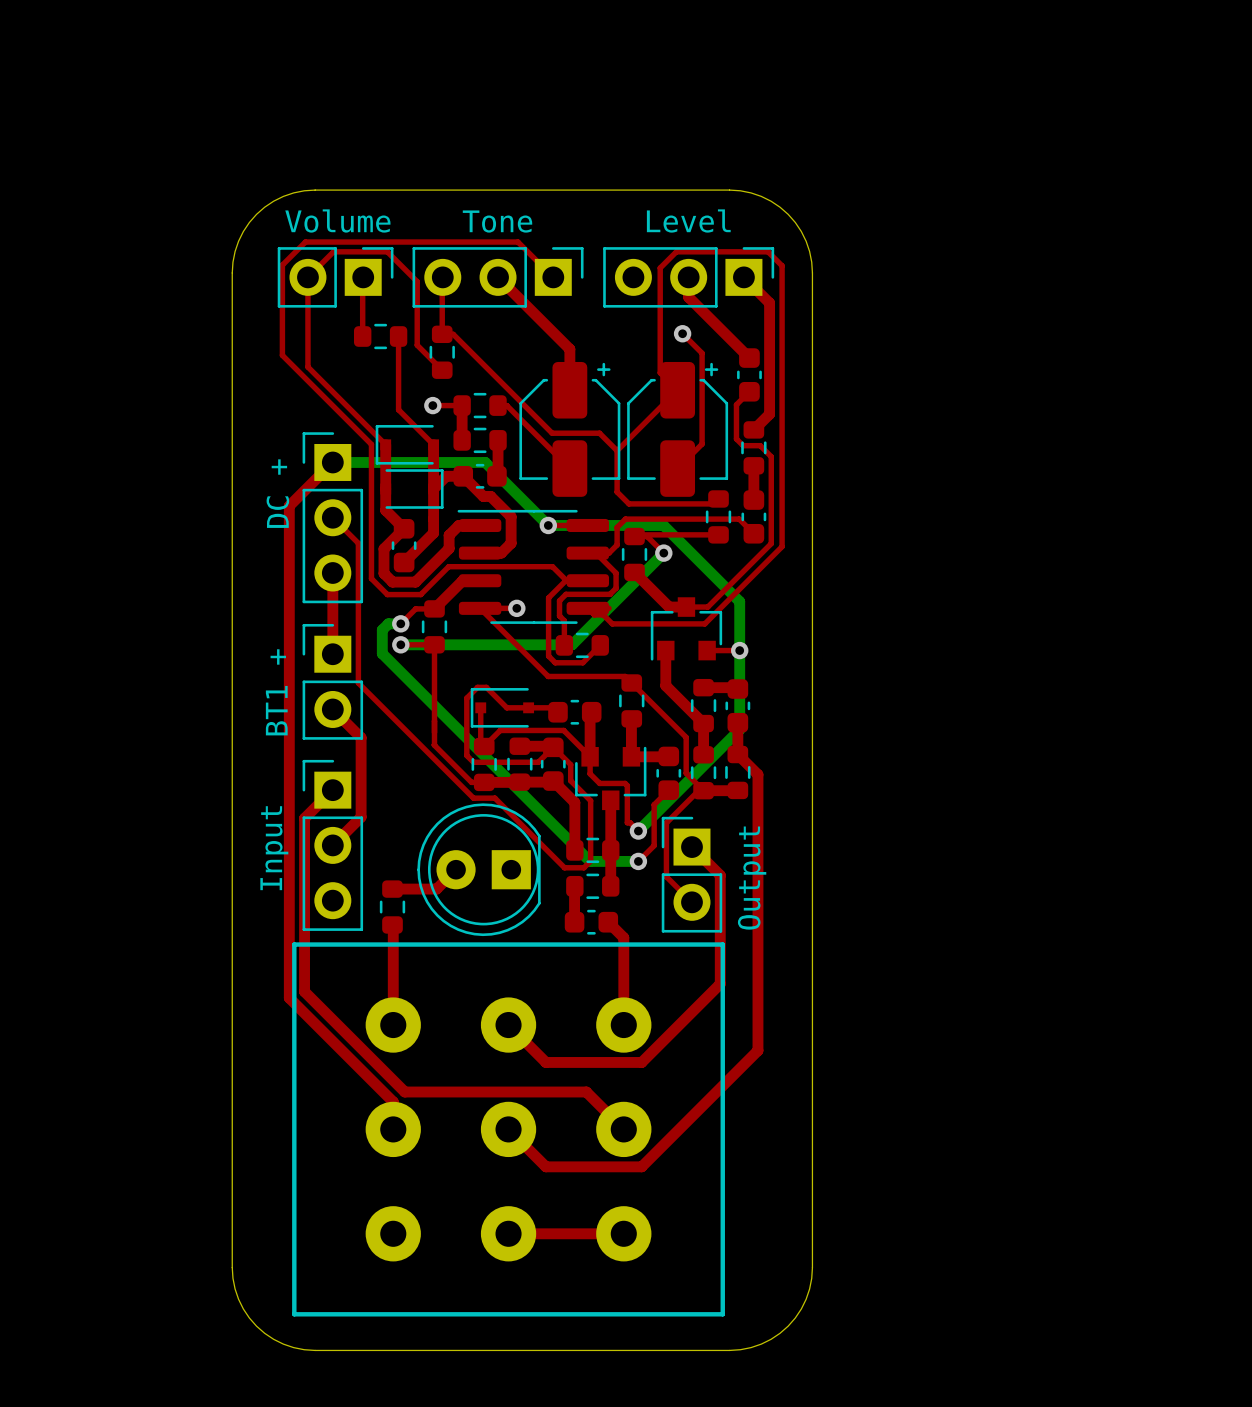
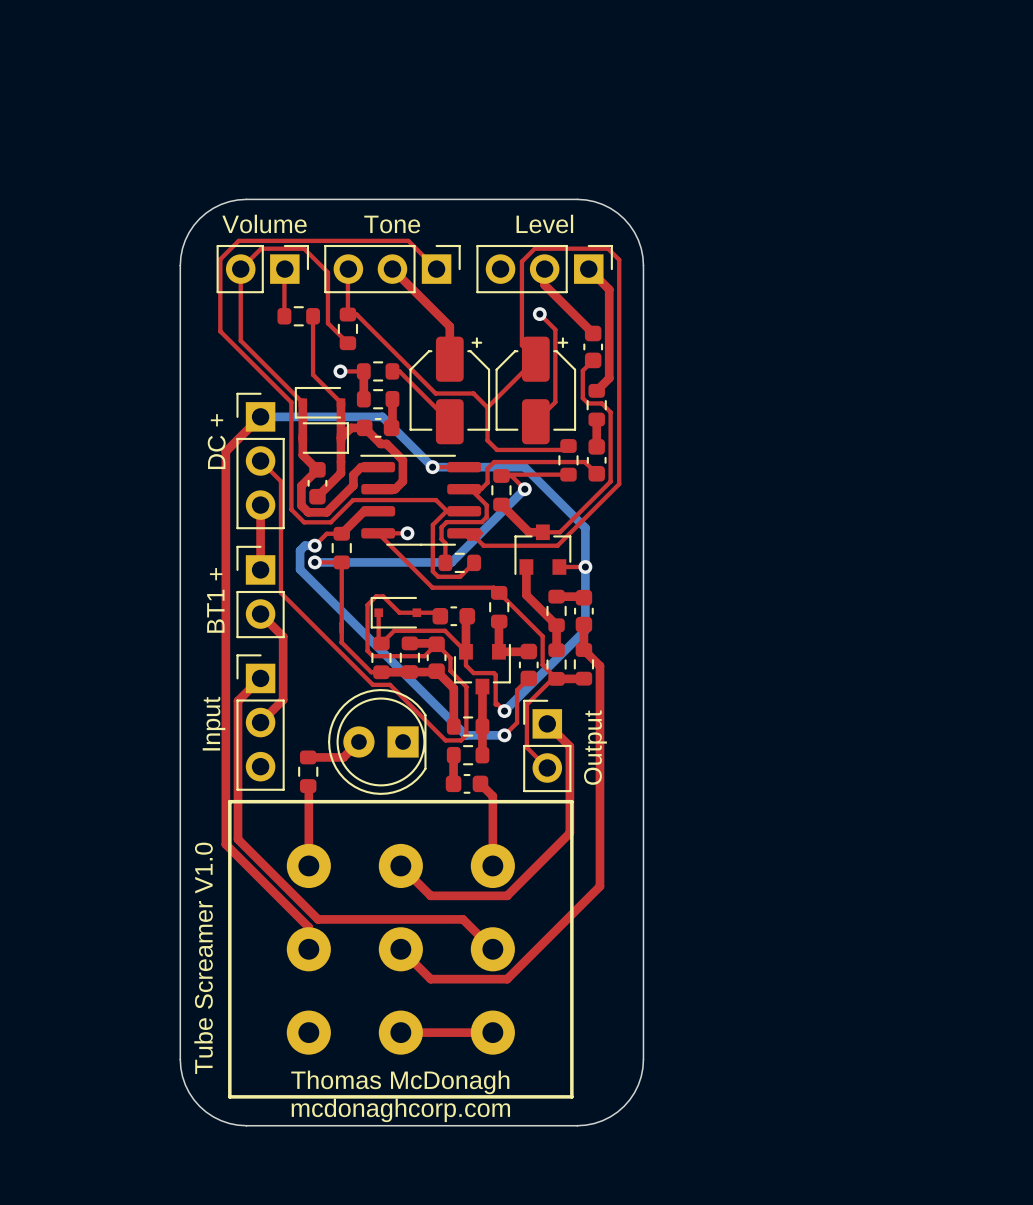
text: none -> Tube Screamer V1.0 (203, 958)
text: none -> Thomas McDonagh (400, 1082)
text: none -> mcdonaghcorp.com (400, 1110)

